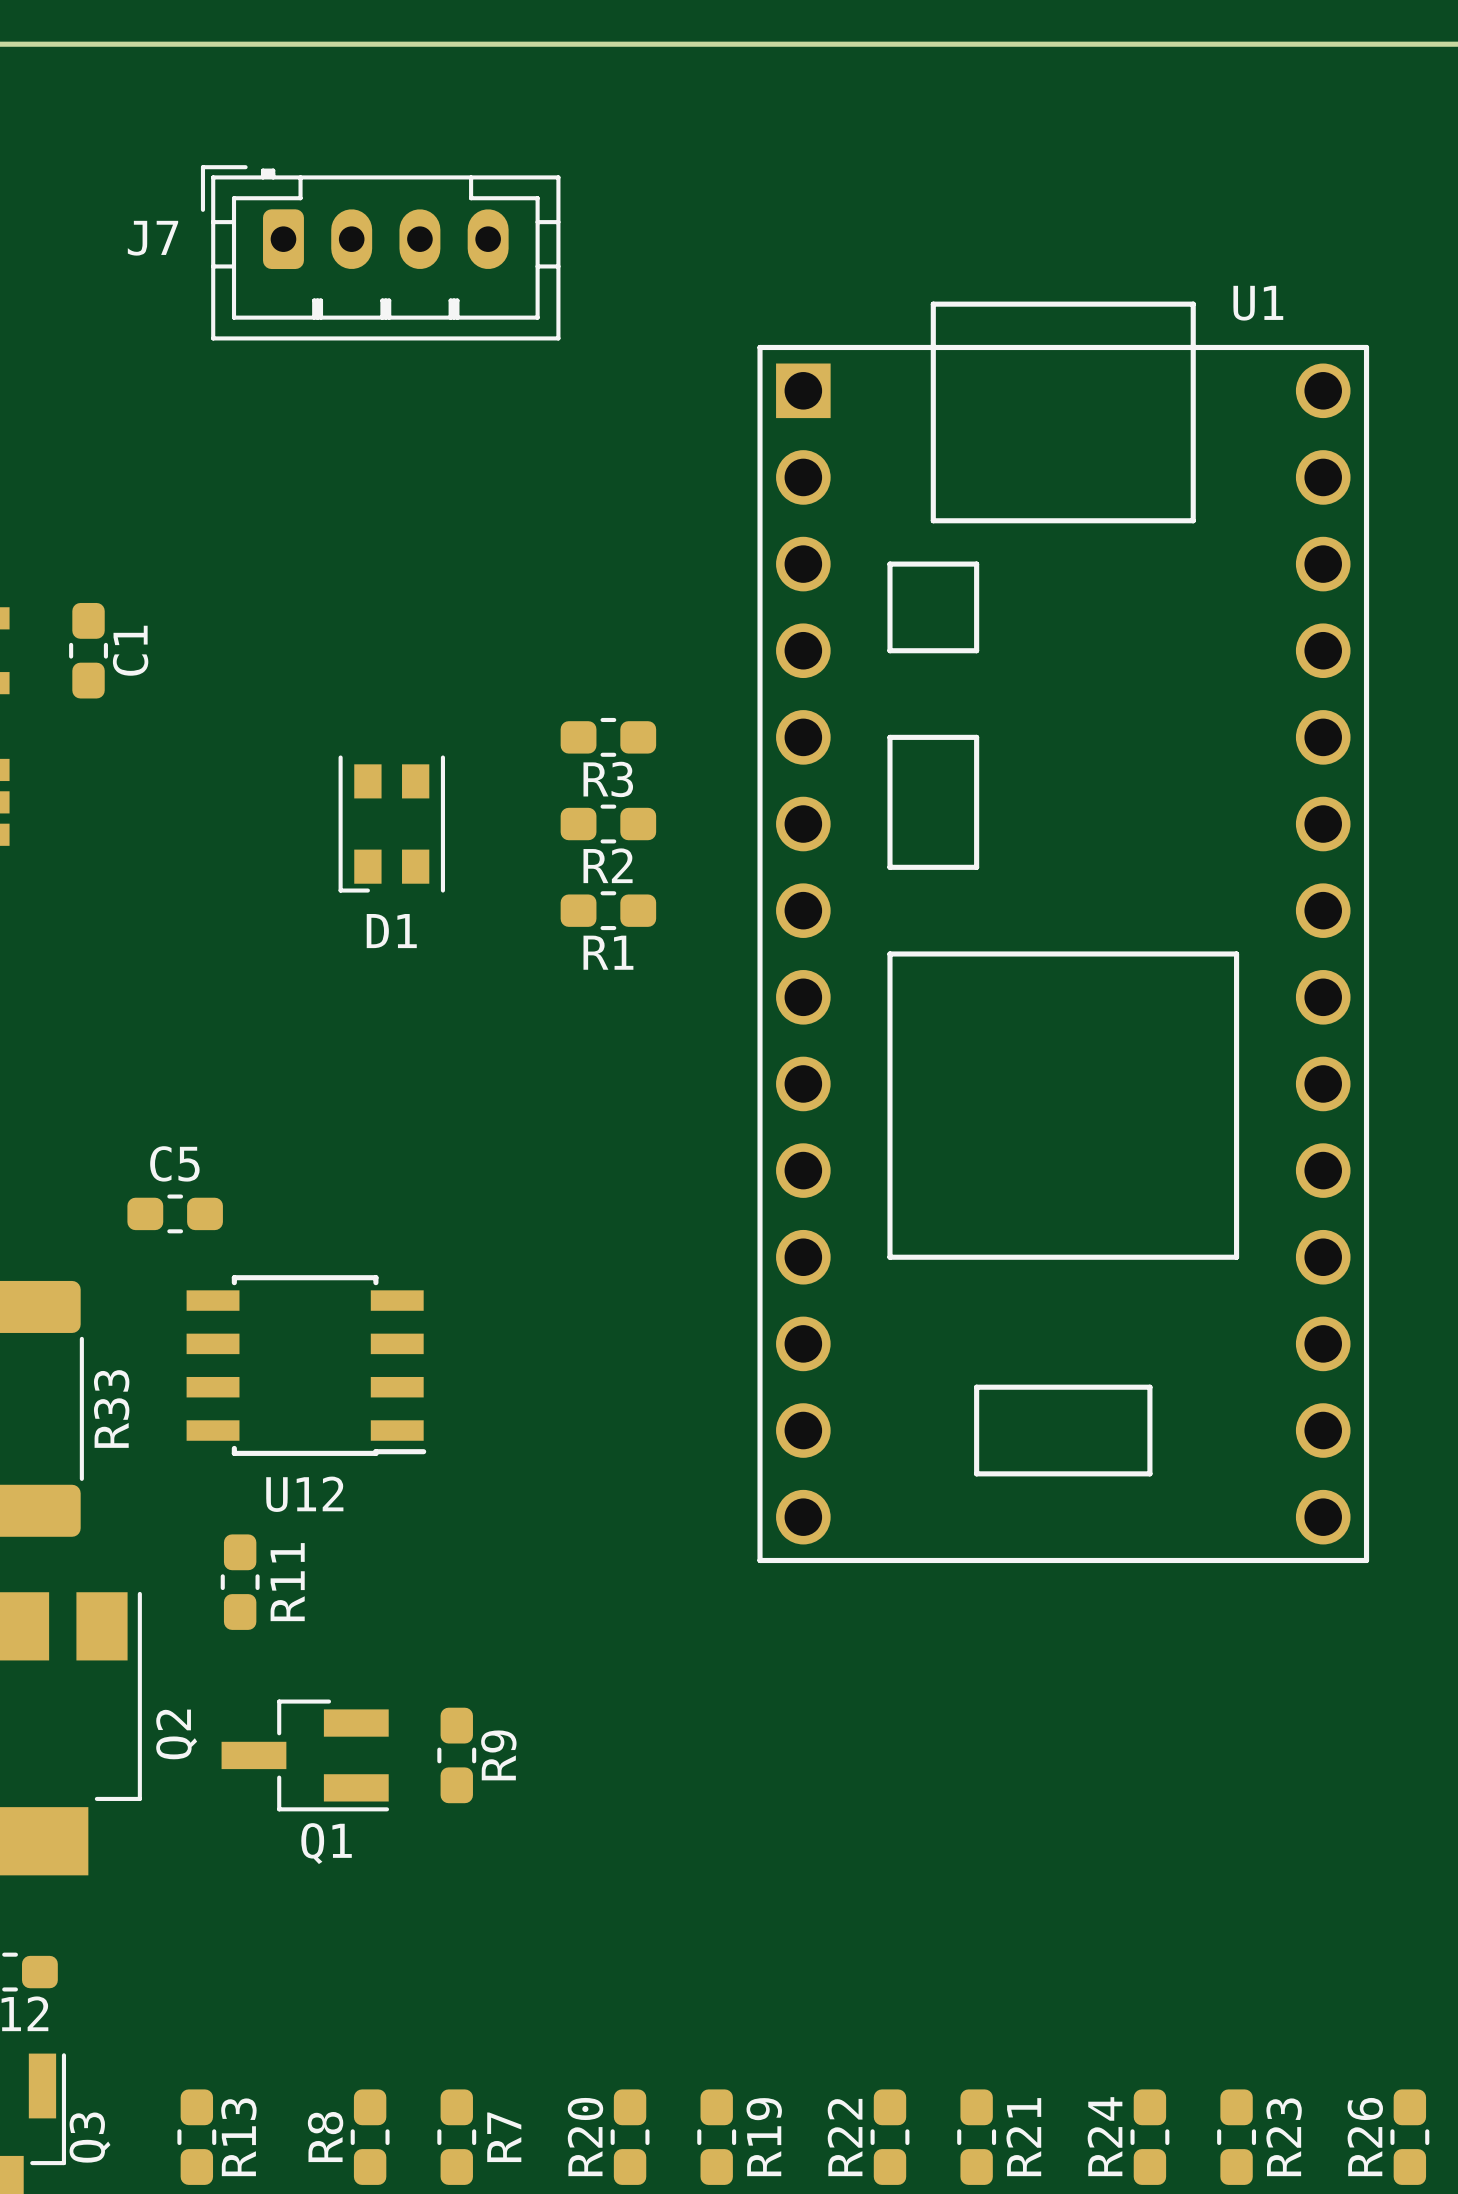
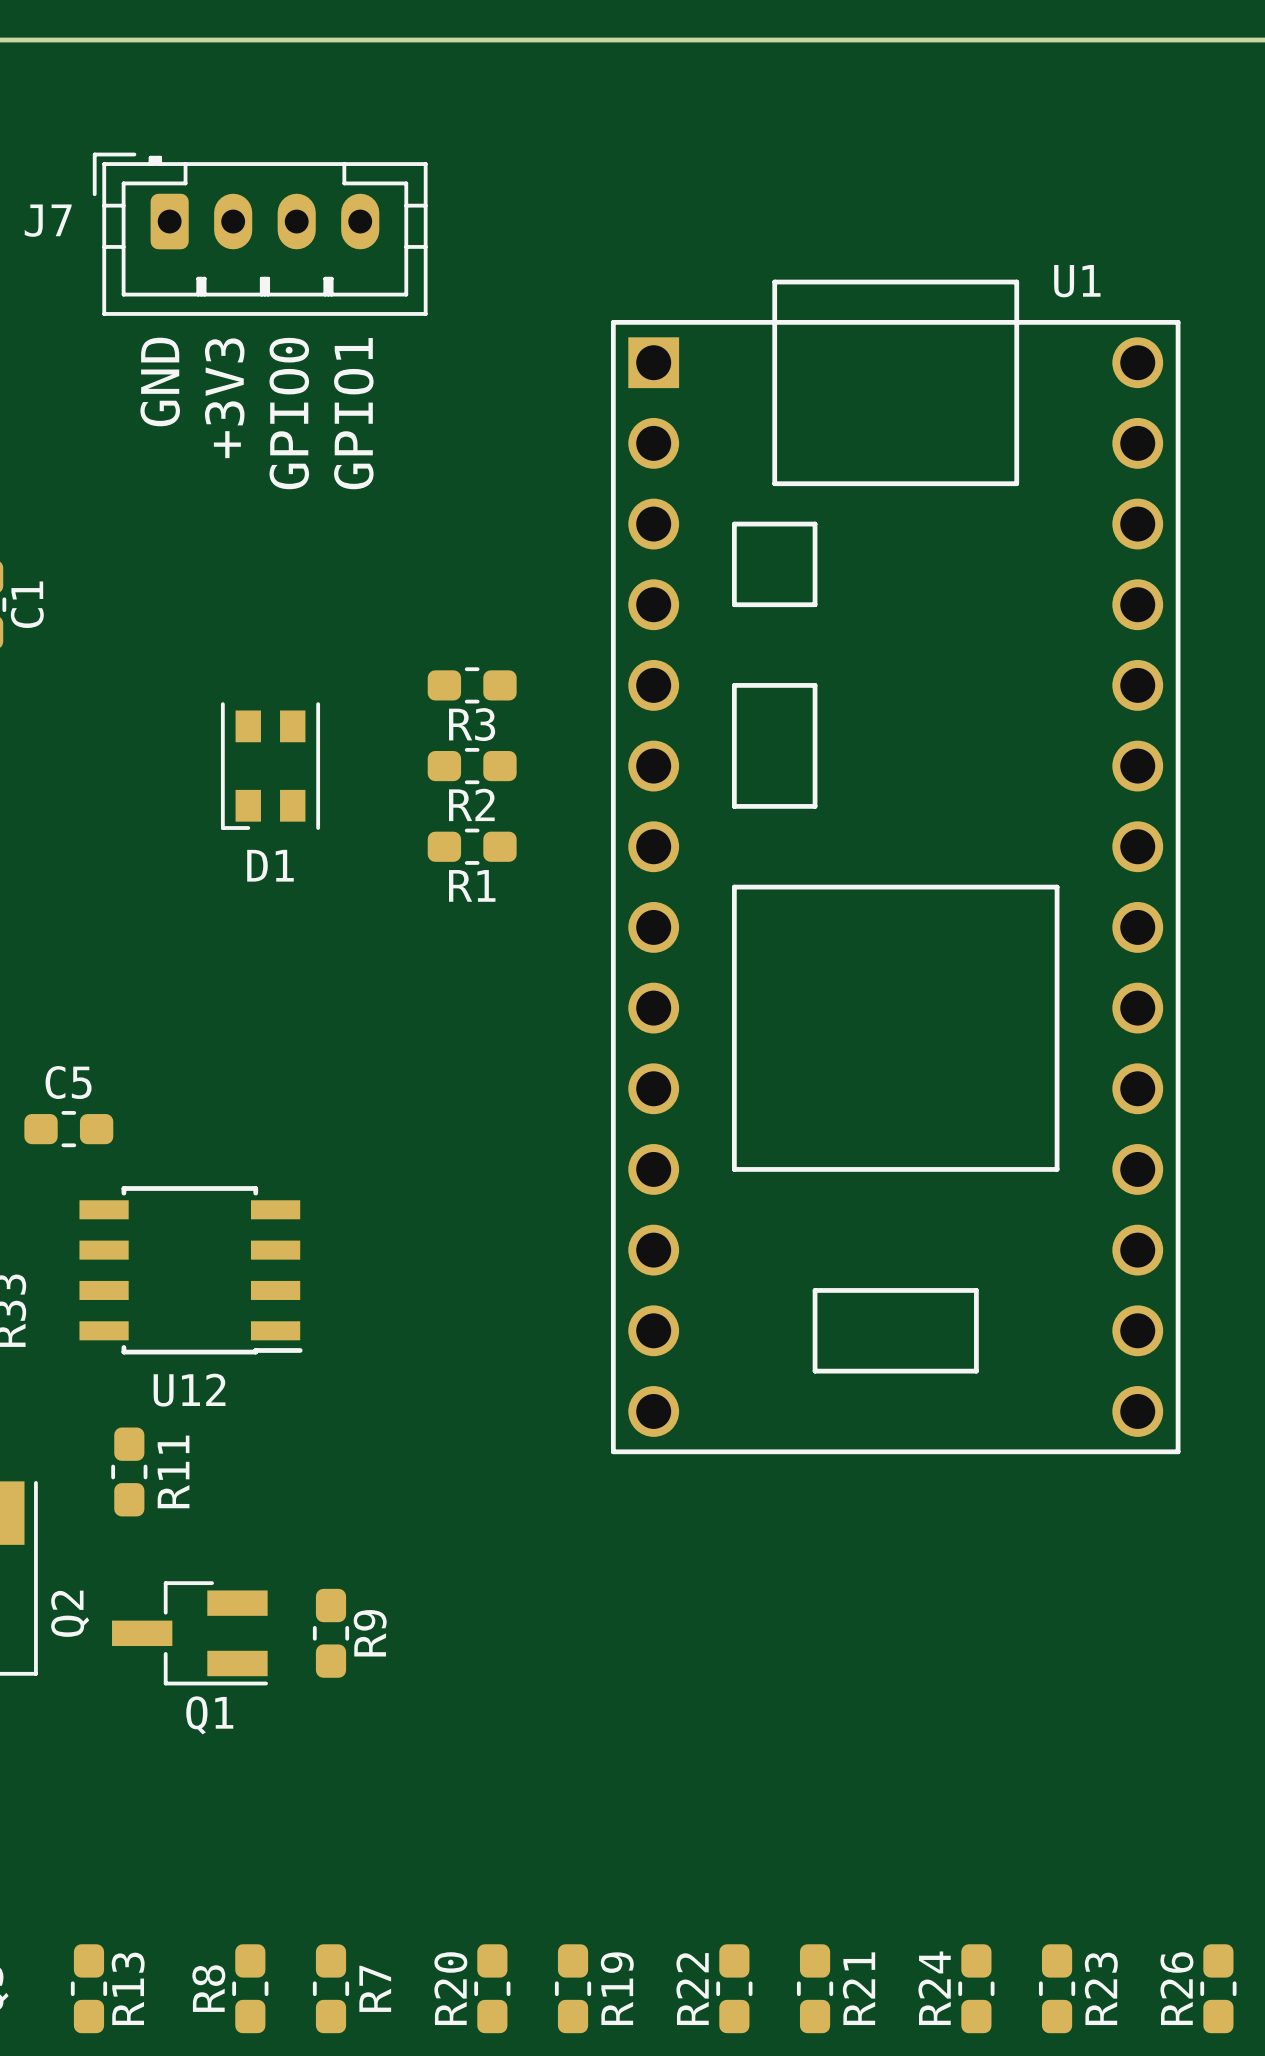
text: none -> GND (160, 382)
text: none -> +3V3 (224, 398)
text: none -> GPIO0 (289, 413)
text: none -> GPIO1 (353, 413)

